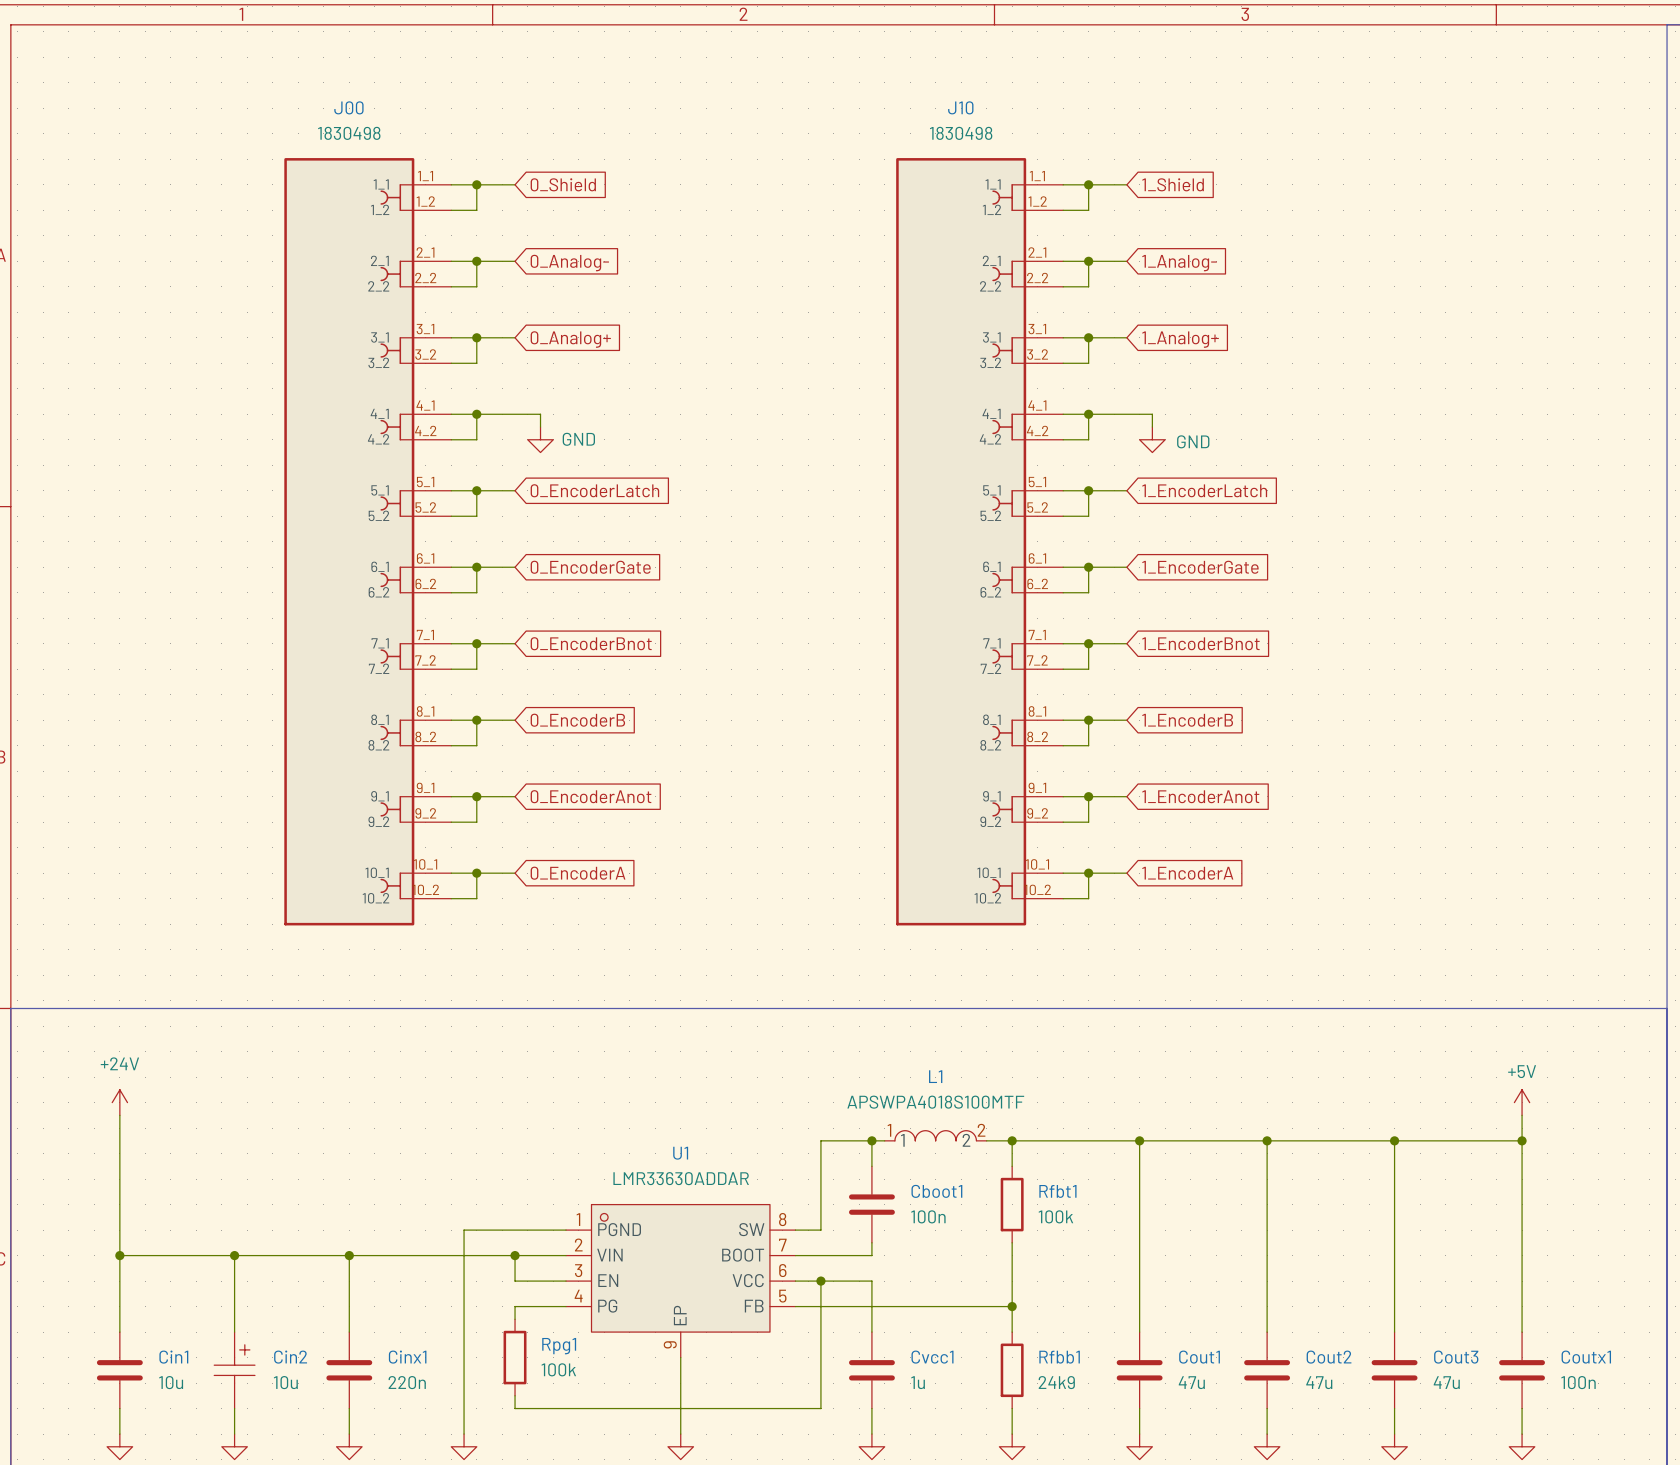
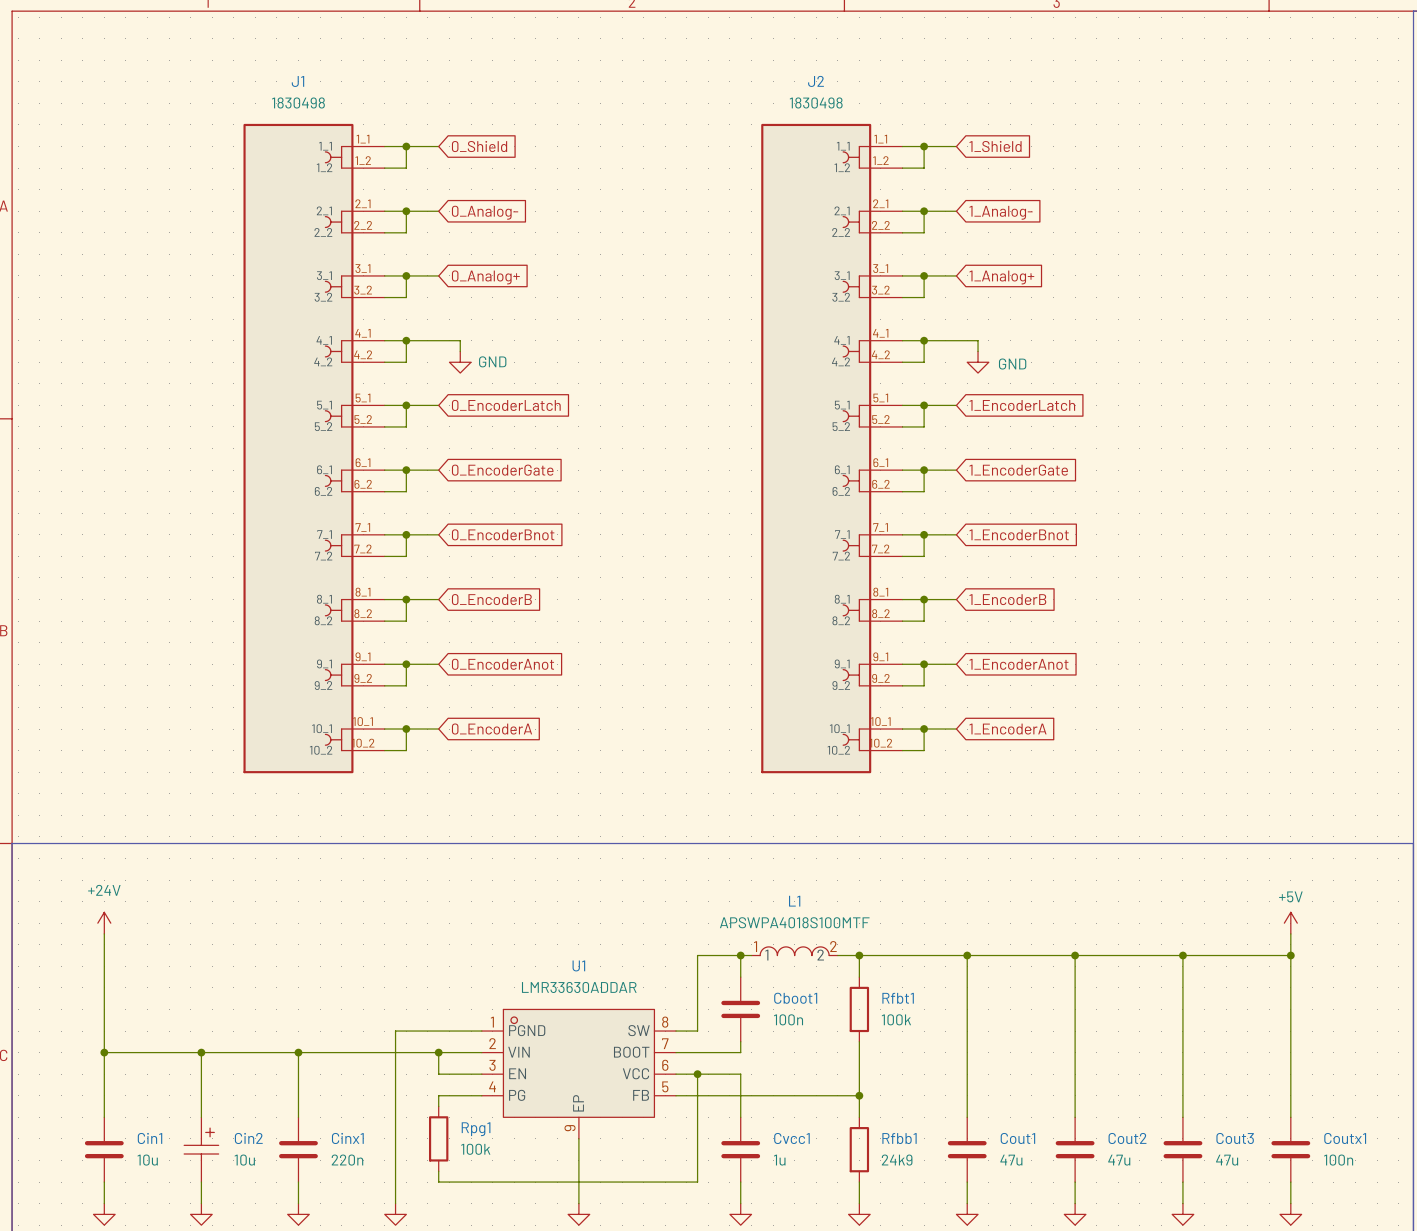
J00 name: J00 (348, 107) -> J1 (297, 81)
J10 name: J10 (960, 107) -> J2 (816, 81)

